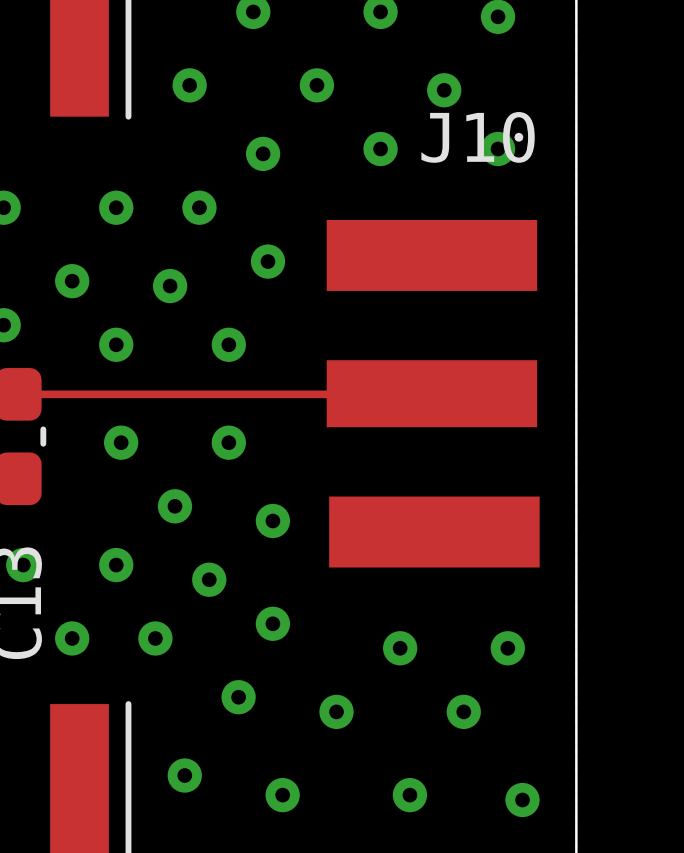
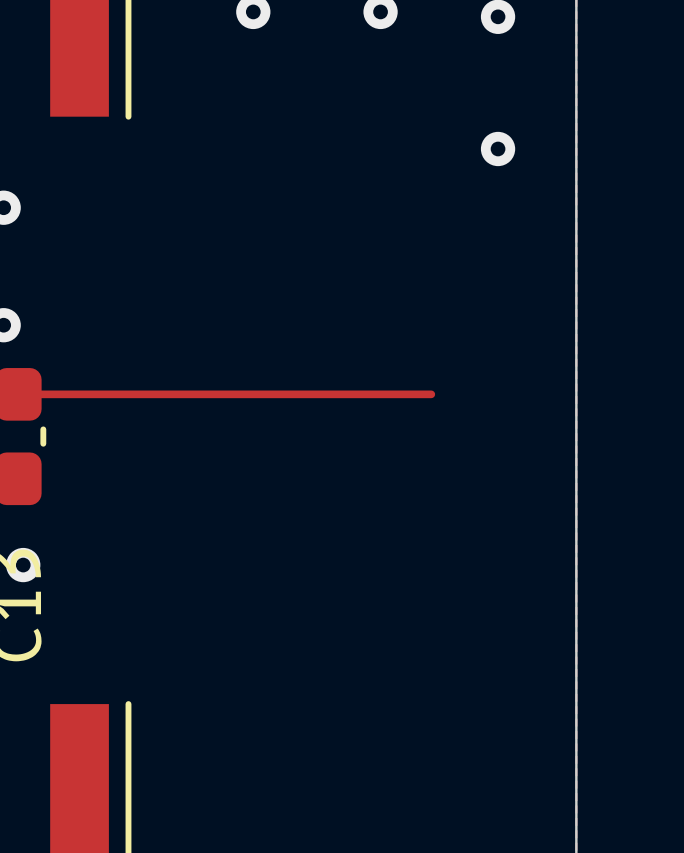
via: (189, 85) -> none
via: (316, 85) -> none
via: (444, 90) -> none
via: (380, 148) -> none
via: (263, 153) -> none
via: (116, 207) -> none
via: (199, 207) -> none
via: (267, 261) -> none
via: (72, 281) -> none
via: (170, 286) -> none
via: (116, 344) -> none
via: (228, 344) -> none
J10: (433, 393) -> none
via: (121, 442) -> none
via: (228, 442) -> none
via: (174, 506) -> none
via: (272, 521) -> none
via: (116, 565) -> none
via: (209, 579) -> none
via: (272, 623) -> none
via: (72, 638) -> none
via: (155, 638) -> none
via: (400, 648) -> none
via: (507, 648) -> none
via: (238, 697) -> none
via: (336, 711) -> none
via: (463, 711) -> none
via: (184, 775) -> none
via: (282, 795) -> none
via: (409, 795) -> none
via: (522, 800) -> none

